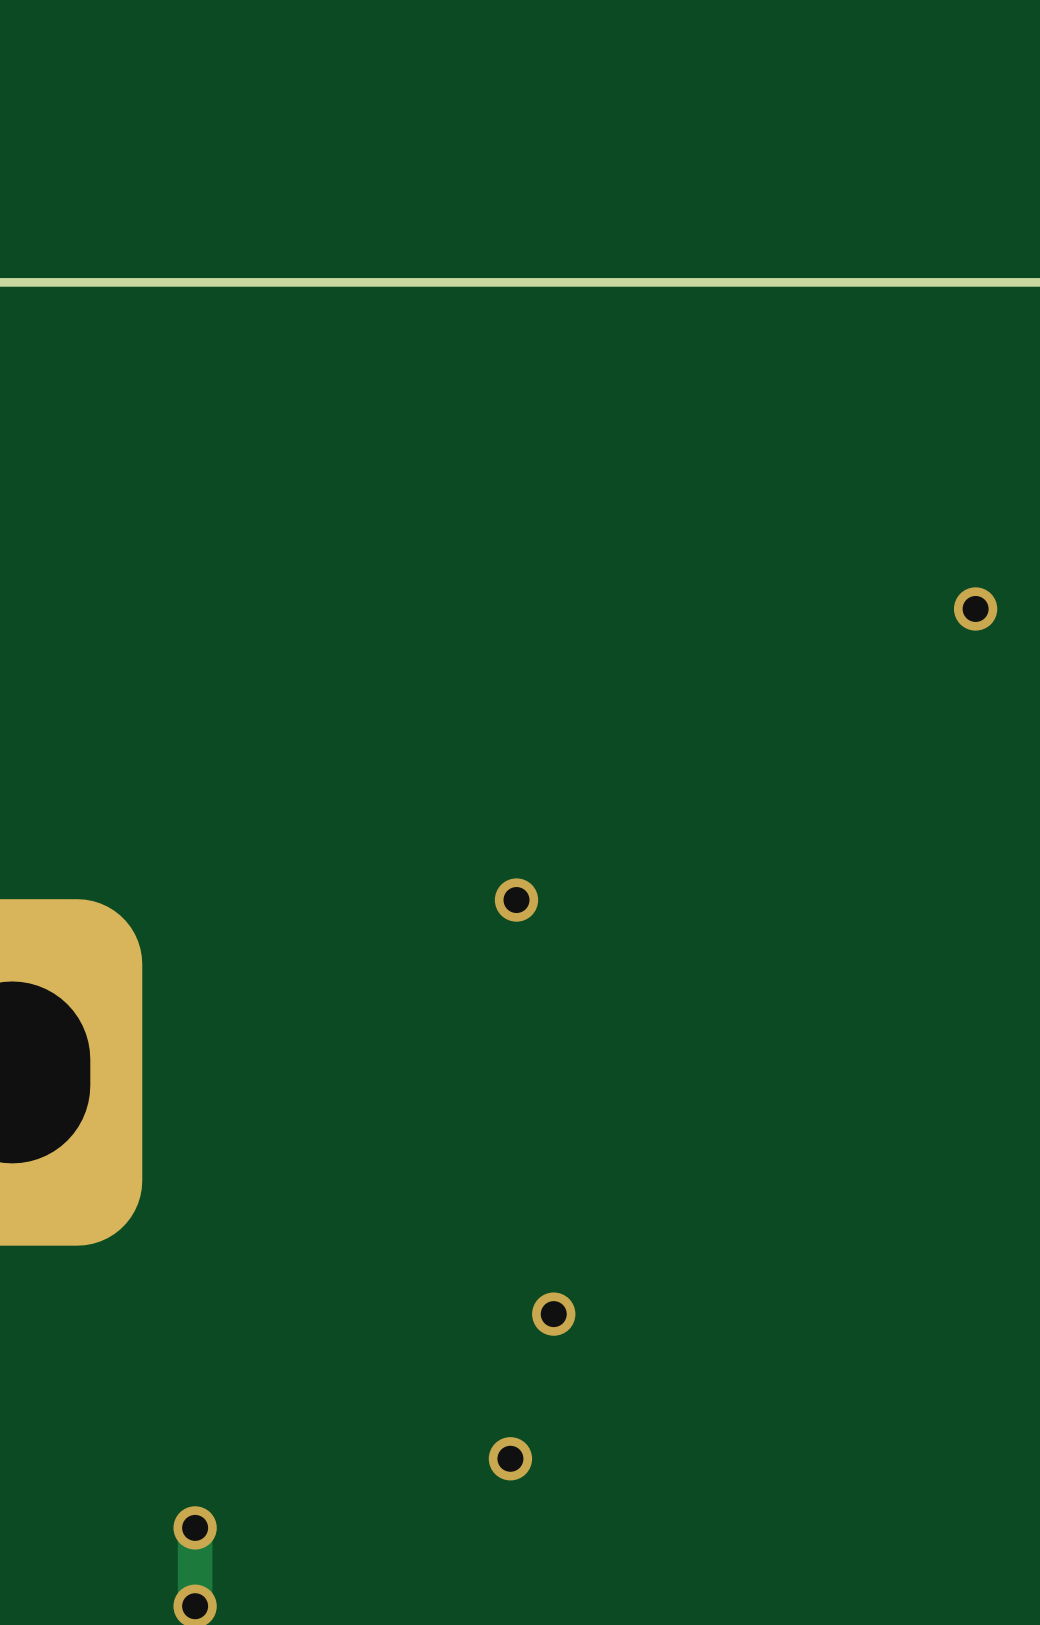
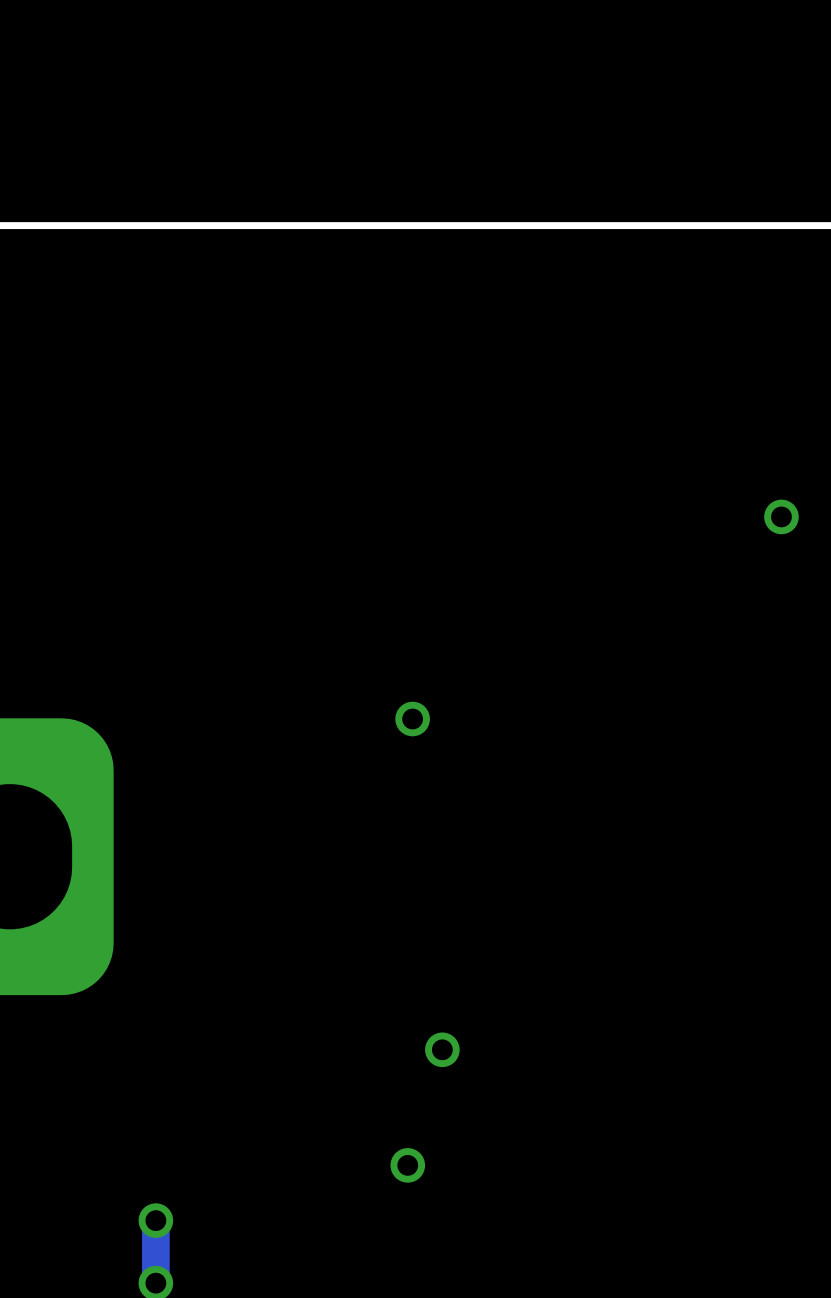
via position: (975, 608) -> (781, 516)

